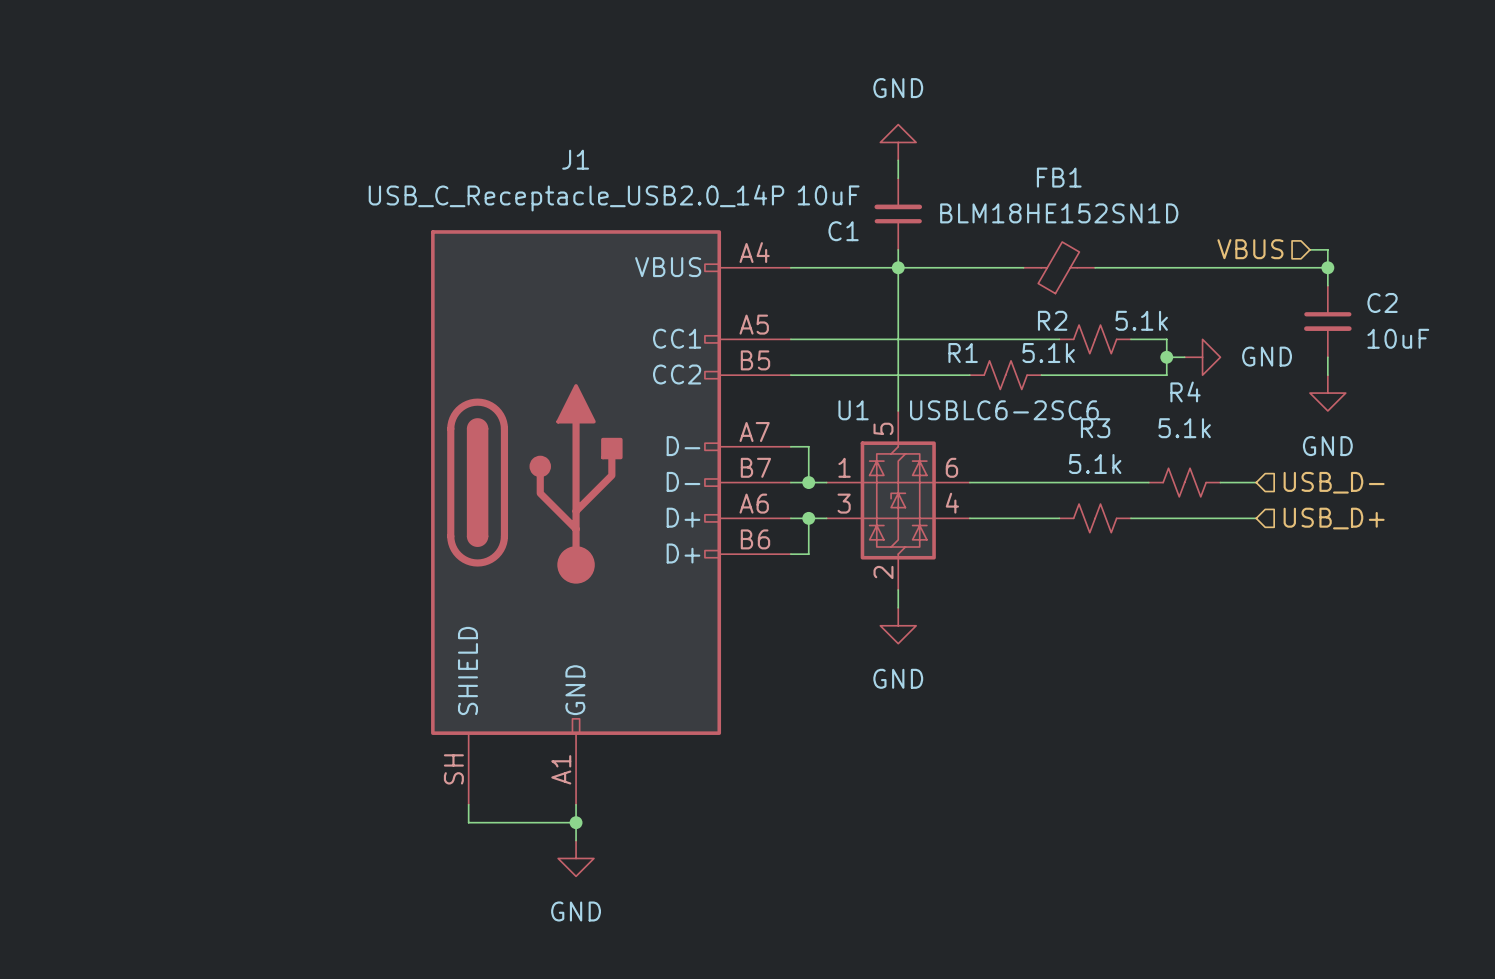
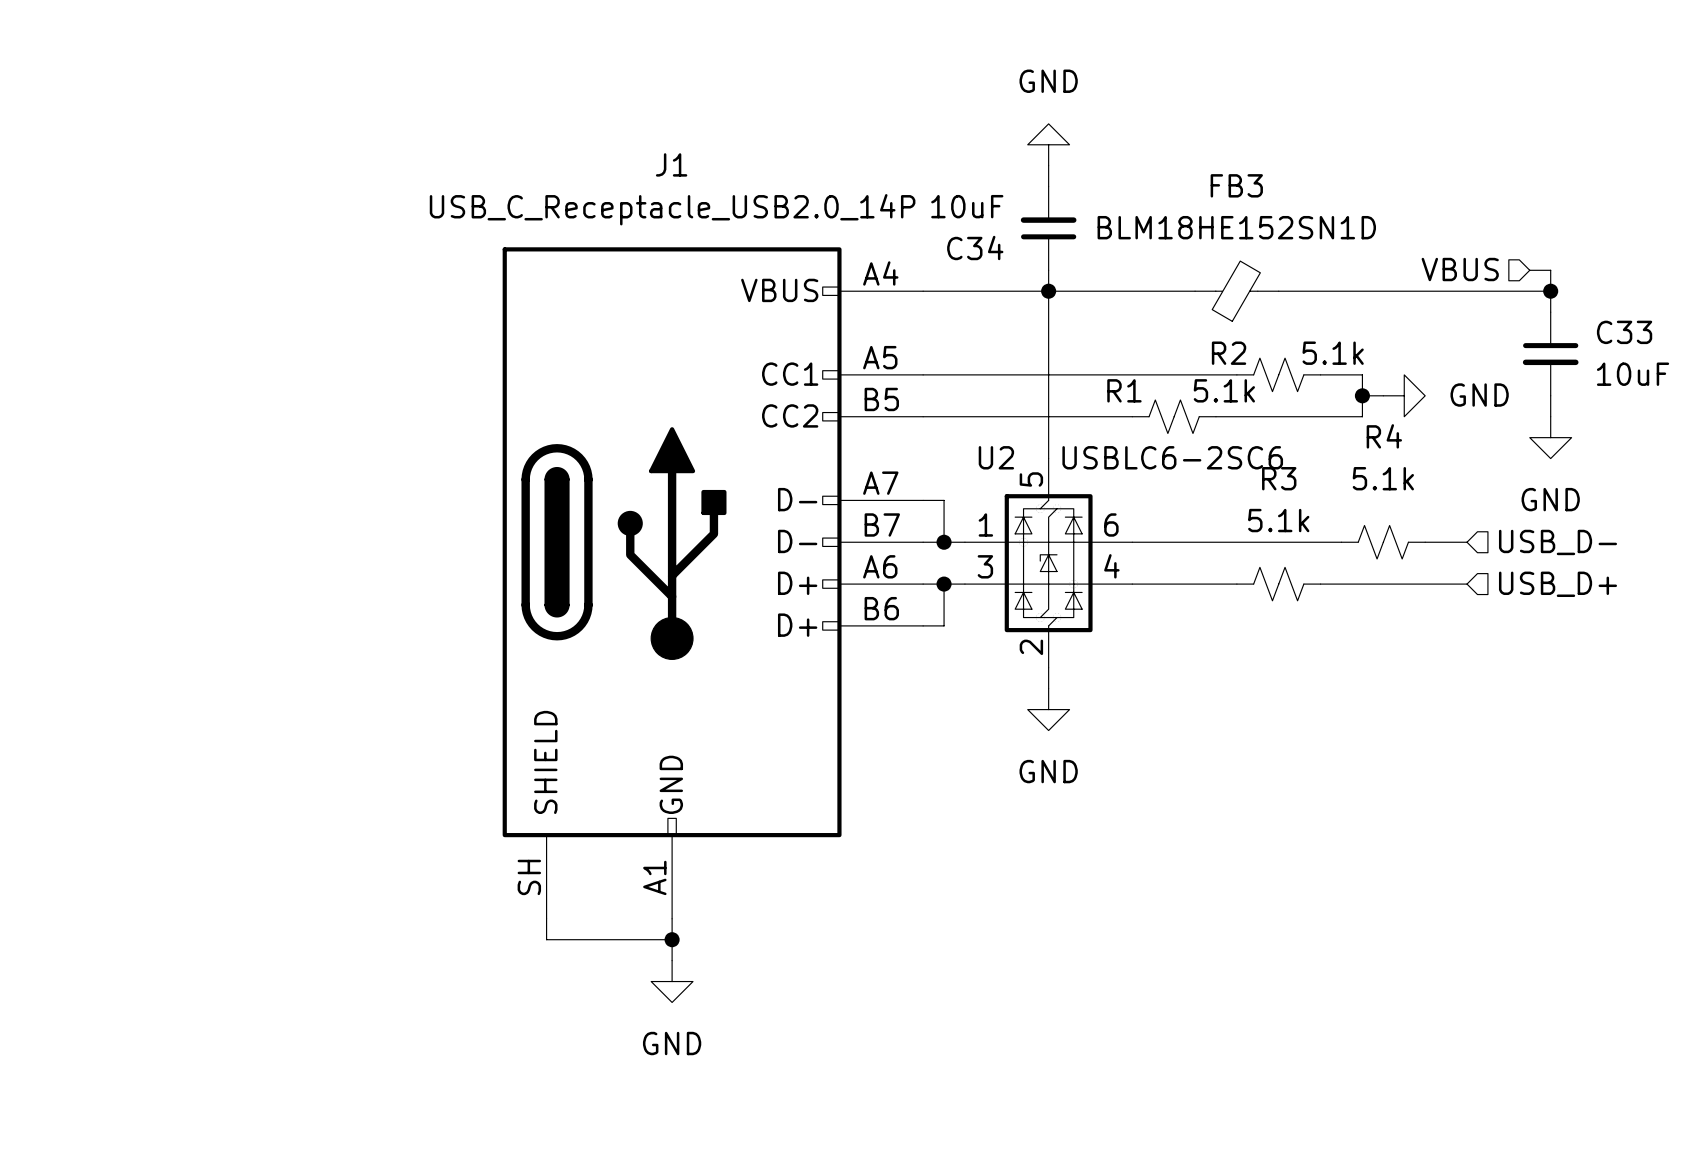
FB1 name: FB1 (1059, 177) -> FB3 (1236, 185)
C1 name: C1 (843, 231) -> C34 (975, 247)
C2 name: C2 (1382, 302) -> C33 (1624, 332)
U1 name: U1 (853, 410) -> U2 (996, 457)

